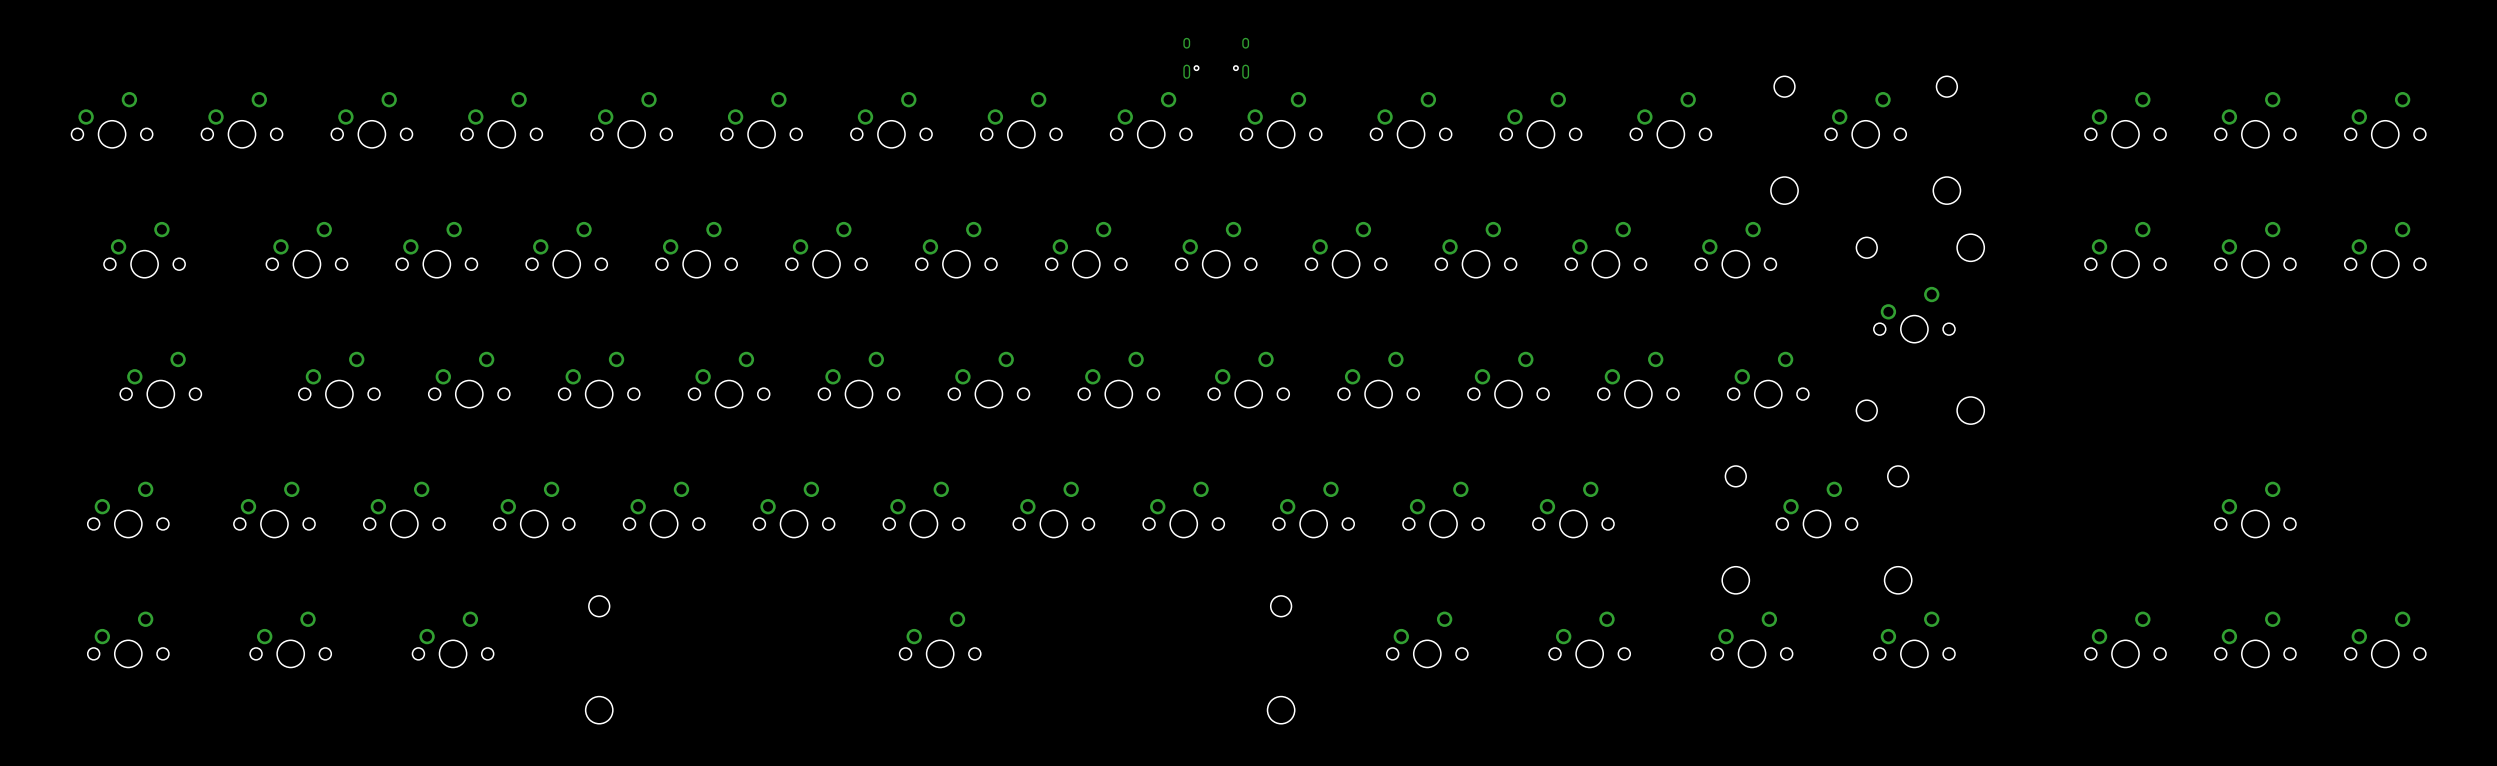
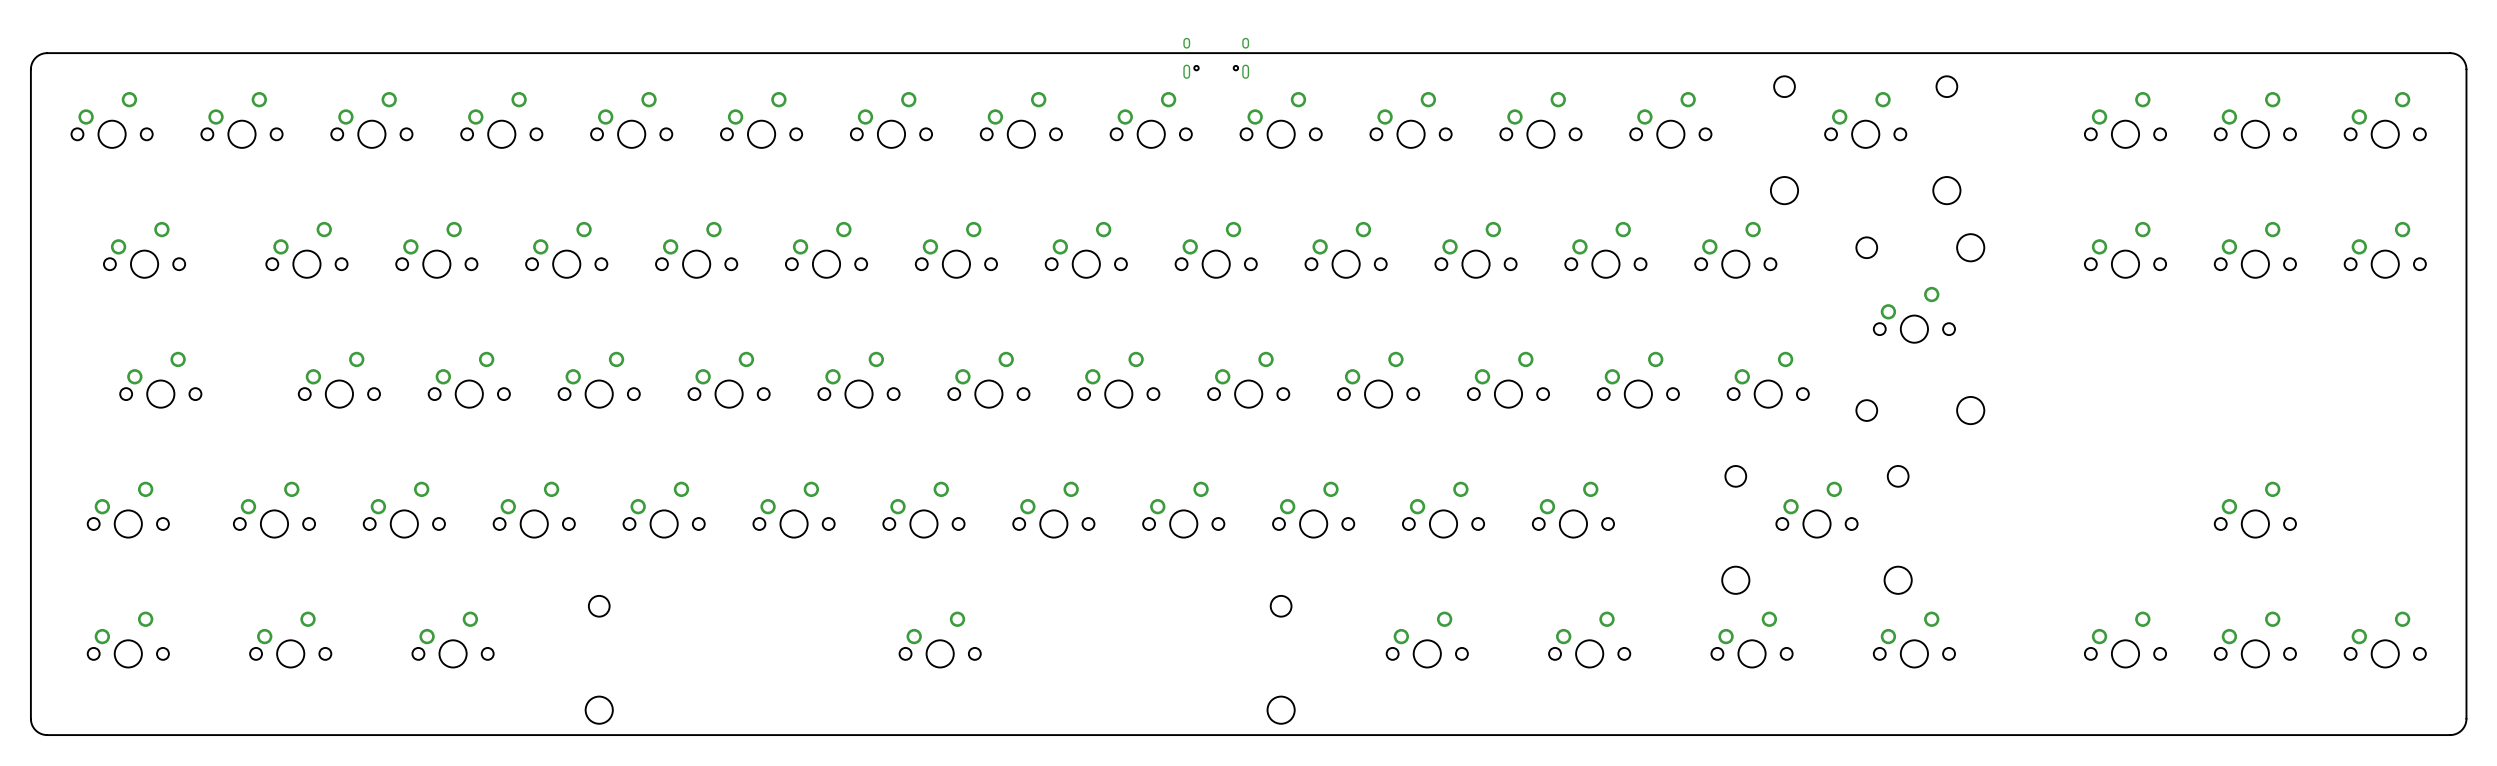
board edge: none -> (47, 53) (2454, 53) (2463, 59) (2466, 69) (2465, 723) (2460, 731) (2450, 735) (42, 734) (34, 728) (30, 718) (30, 69) (35, 57) (47, 53)

